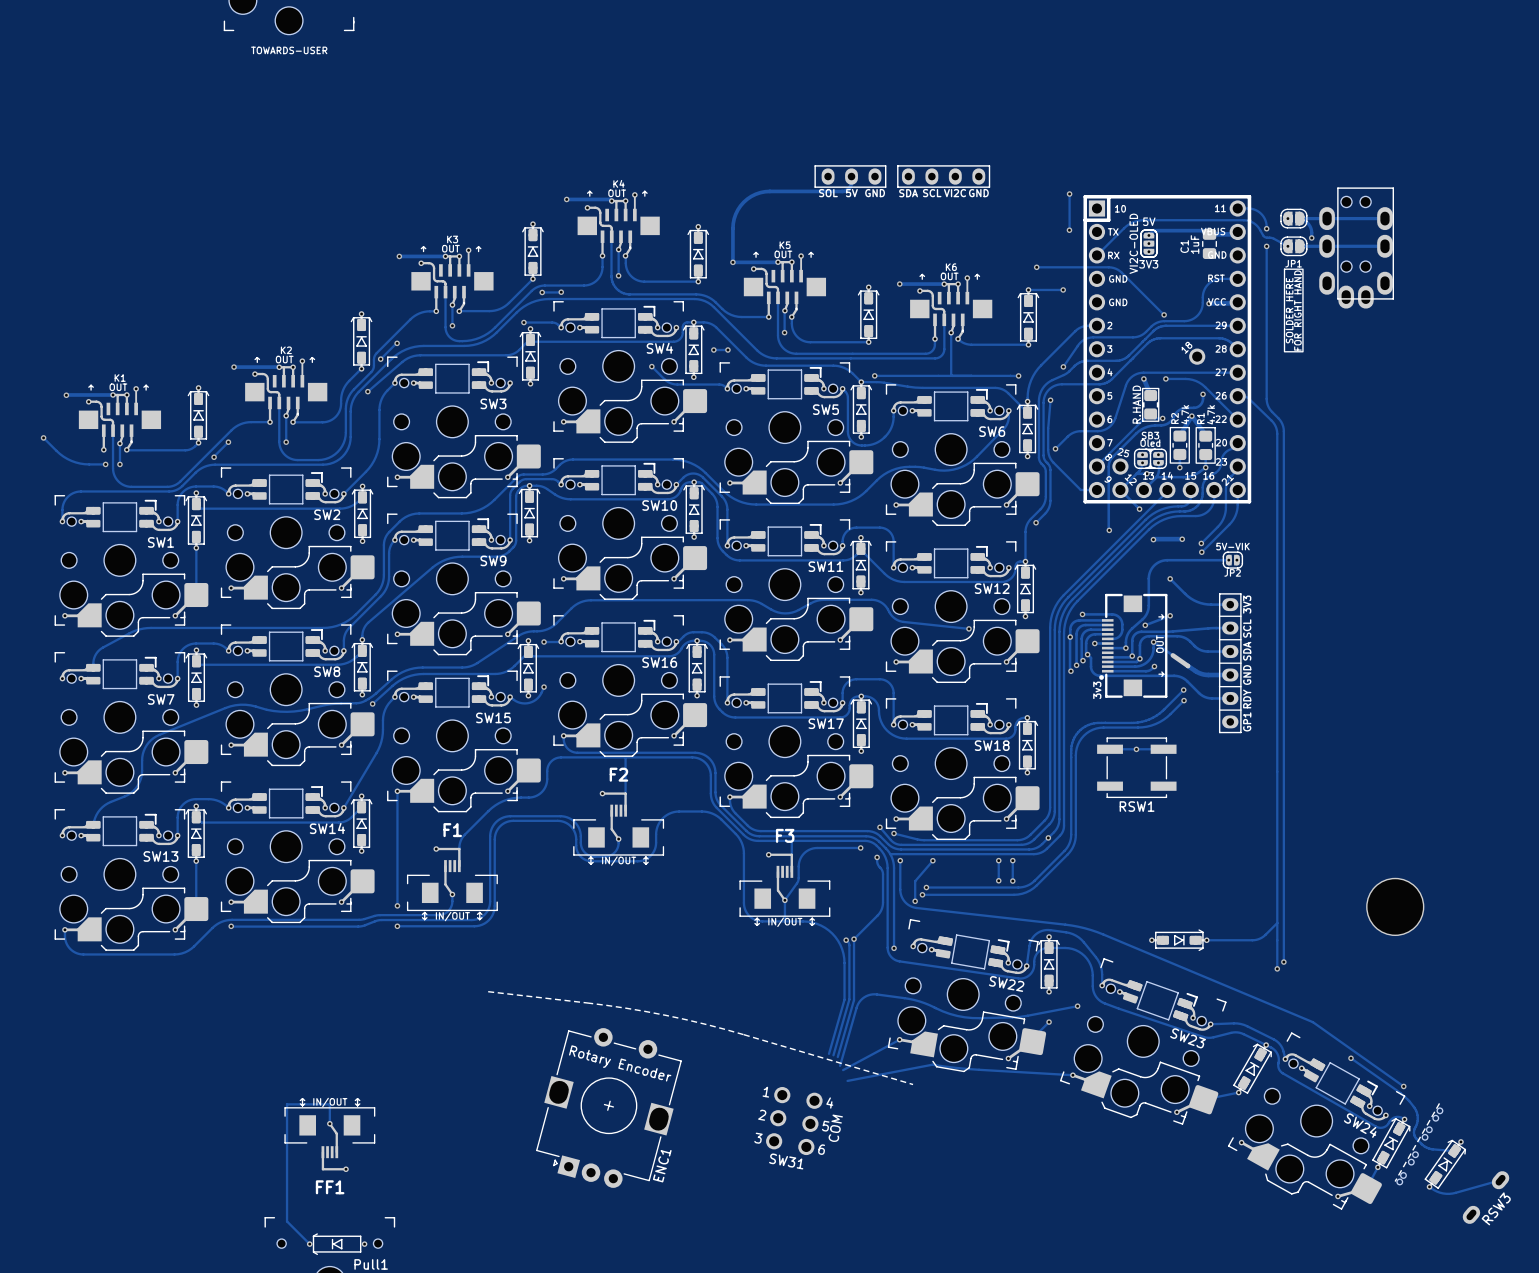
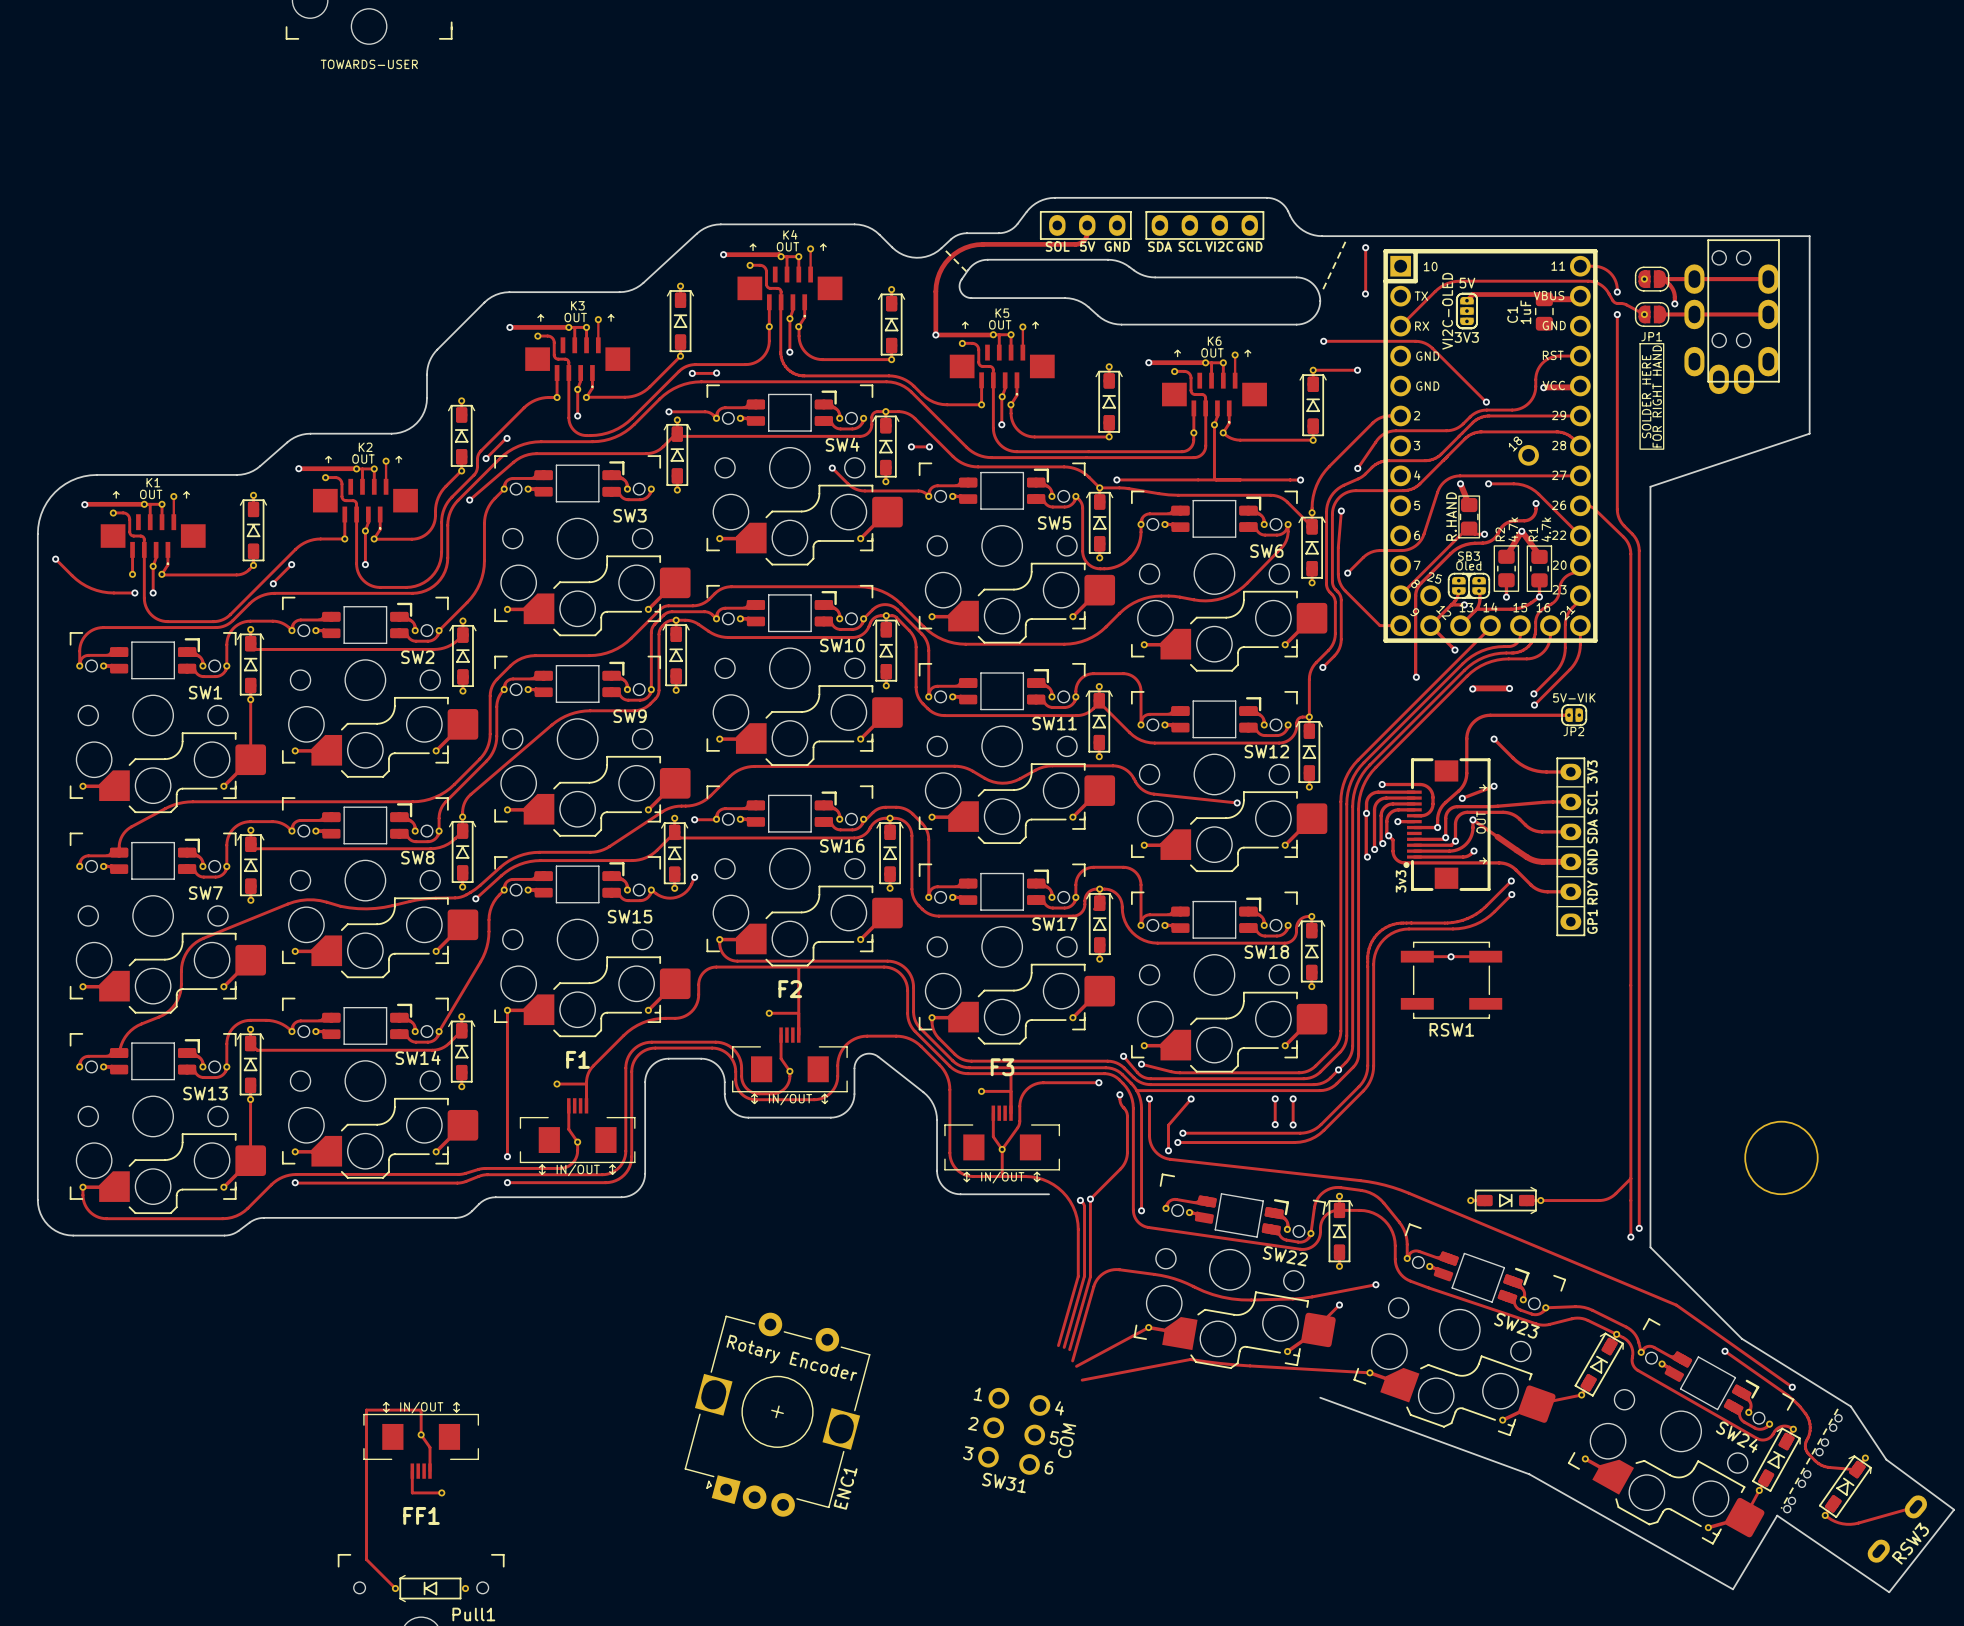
line: none -> (1346, 239) (1323, 289)
line: none -> (945, 250) (966, 271)
board edge: none -> (987, 259) (1111, 259) (1122, 262) (1140, 274) (1151, 277) (1299, 277) (1306, 279) (1315, 286) (1318, 293) (1320, 303) (1313, 317) (1299, 324) (1117, 324) (1104, 320) (1085, 304) (1073, 299) (971, 298) (964, 295) (959, 287) (961, 279) (974, 263) (987, 259)
board edge: none -> (1049, 1194) (960, 1194) (945, 1189) (939, 1180) (937, 1173) (937, 1120) (933, 1104) (923, 1092) (873, 1054) (862, 1055) (855, 1063) (854, 1096) (850, 1106) (841, 1115) (830, 1117) (740, 1116) (731, 1110) (727, 1104) (724, 1077) (715, 1063) (703, 1058) (668, 1058) (656, 1062) (646, 1074) (645, 1176) (640, 1188) (626, 1196) (492, 1197) (481, 1202) (466, 1215) (457, 1217) (261, 1218) (254, 1220) (236, 1232) (227, 1235) (73, 1235) (64, 1234) (51, 1228) (42, 1217) (37, 1200) (37, 533) (39, 520) (46, 502) (65, 483) (83, 476) (241, 474) (256, 468) (290, 439) (302, 434) (391, 433) (405, 430) (416, 423) (424, 411) (426, 402) (427, 367) (432, 354) (491, 296) (509, 292) (619, 292) (632, 289) (643, 282) (700, 230) (716, 224) (859, 224) (876, 231) (899, 252) (912, 257) (921, 257) (934, 253) (953, 237) (961, 233) (1001, 233) (1009, 230) (1015, 225) (1032, 206) (1050, 198) (1266, 197) (1277, 200) (1283, 204) (1299, 228) (1318, 235) (1809, 236) (1809, 433) (1650, 486) (1650, 1247) (1741, 1338) (1850, 1406) (1886, 1459) (1954, 1509) (1889, 1592) (1777, 1515) (1733, 1589) (1529, 1474) (1320, 1397)
line: (488, 991) (607, 1005) (685, 1019) (913, 1084) -> none

